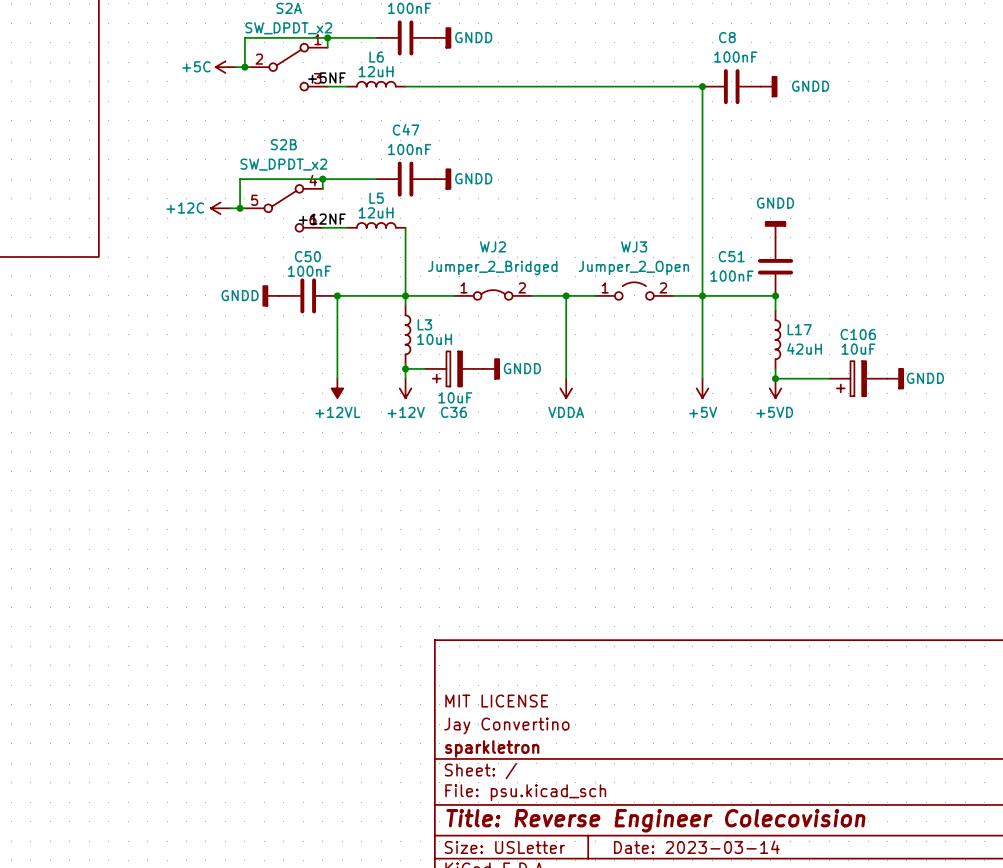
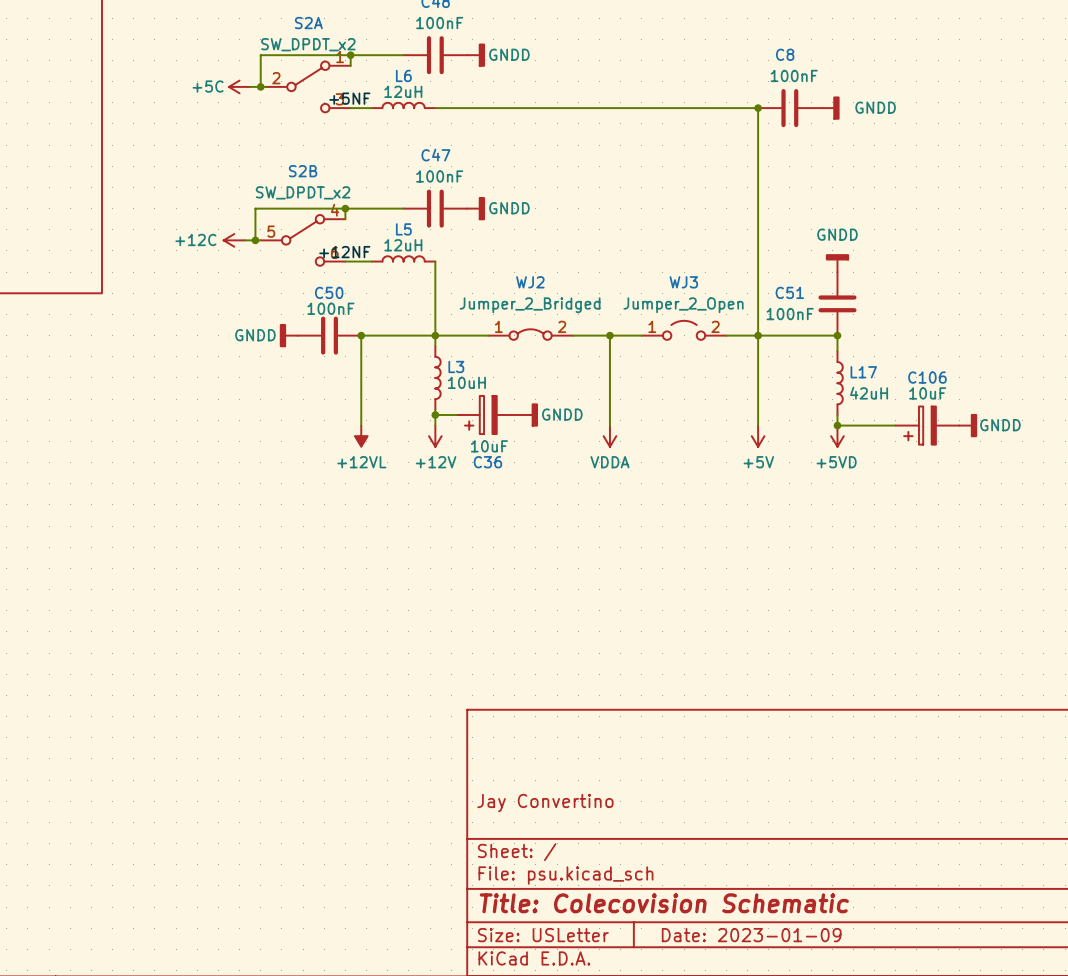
title block: MIT LICENSE (496, 701) -> none
title block: sparkletron (492, 748) -> none
title block: Title: Reverse Engineer Colecovision (655, 820) -> Title: Colecovision Schematic (664, 903)
title block: Date: 2023-03-14 (696, 847) -> Date: 2023-01-09 (751, 935)

